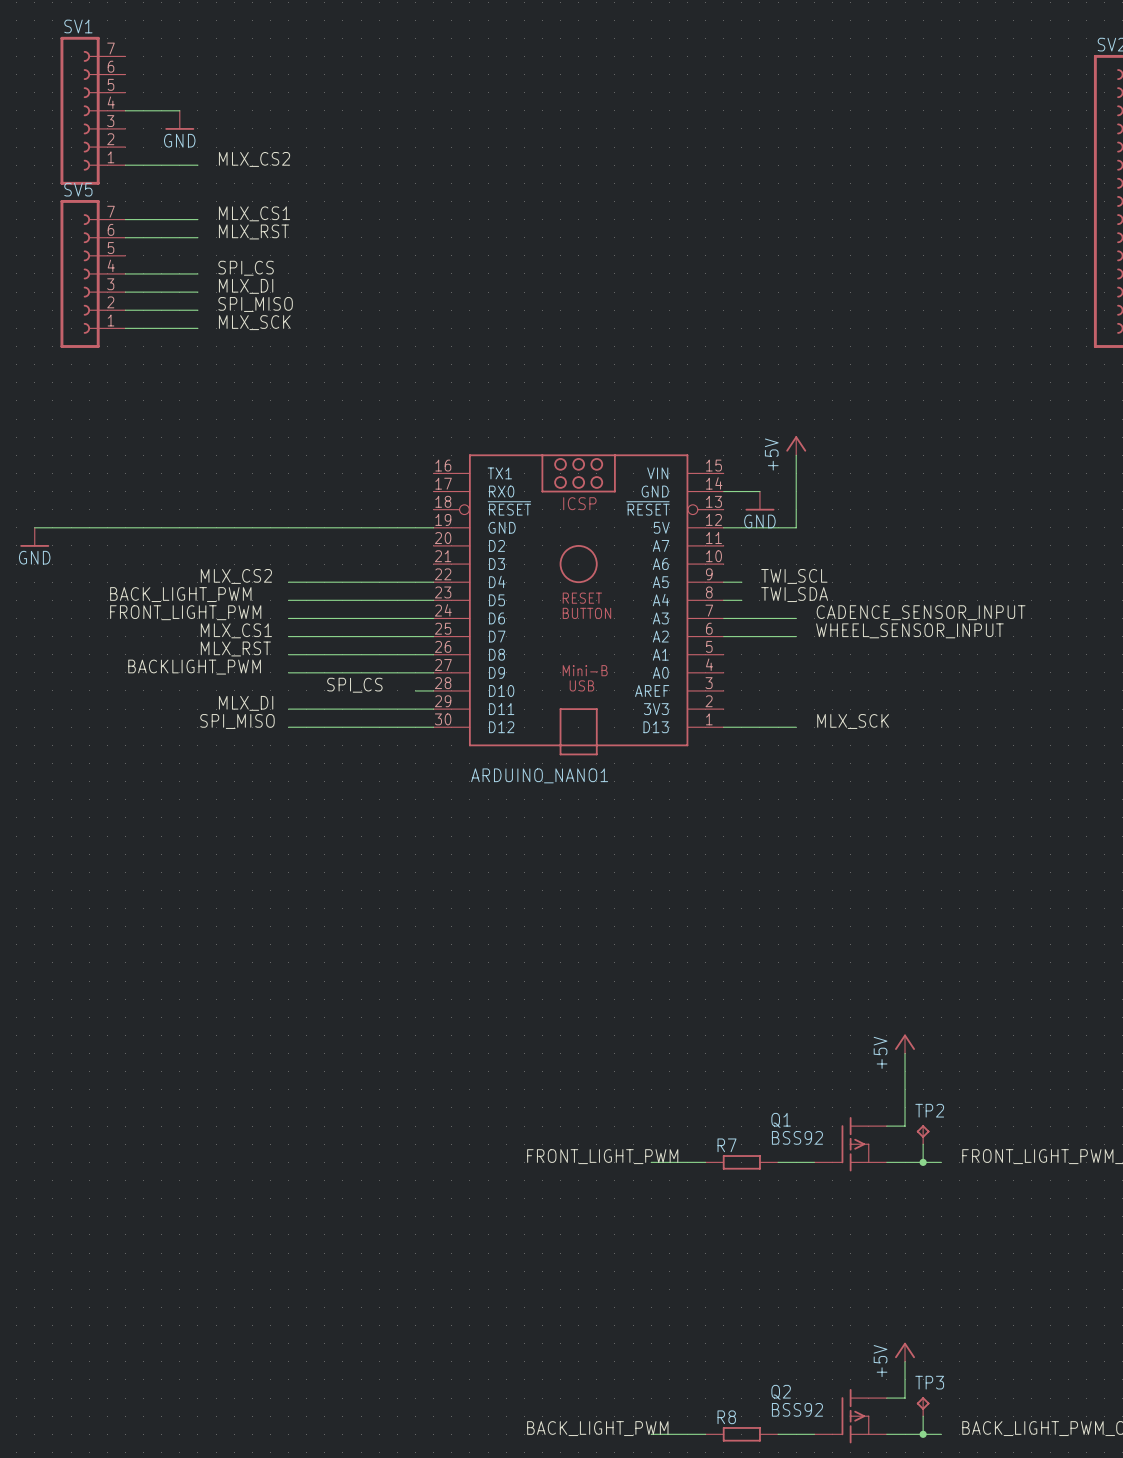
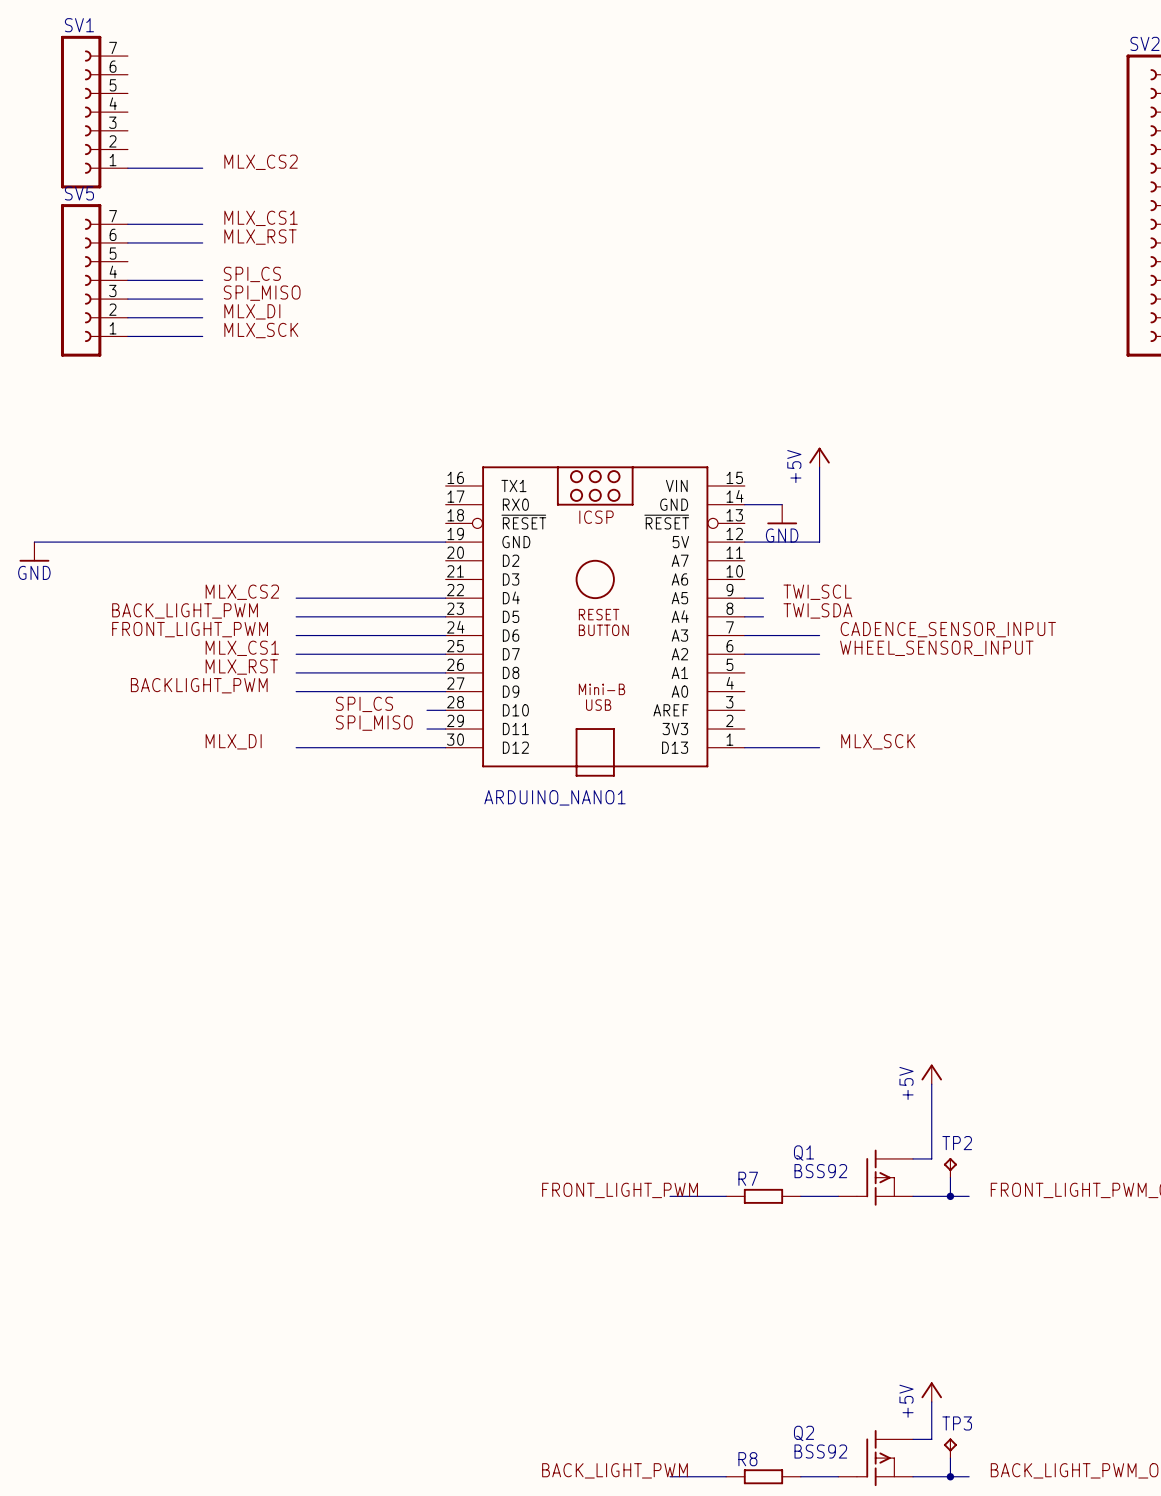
wire: (125, 110) (179, 110) -> none
power symbol: GND (179, 120) -> none
label: MLX_DI (246, 286) -> SPI_MISO (262, 293)
label: SPI_MISO (255, 304) -> MLX_DI (252, 311)
label: MLX_DI (246, 703) -> none
label: none -> SPI_MISO (374, 723)
wire: (288, 709) (415, 709) -> none
label: SPI_MISO (237, 721) -> MLX_DI (233, 741)

